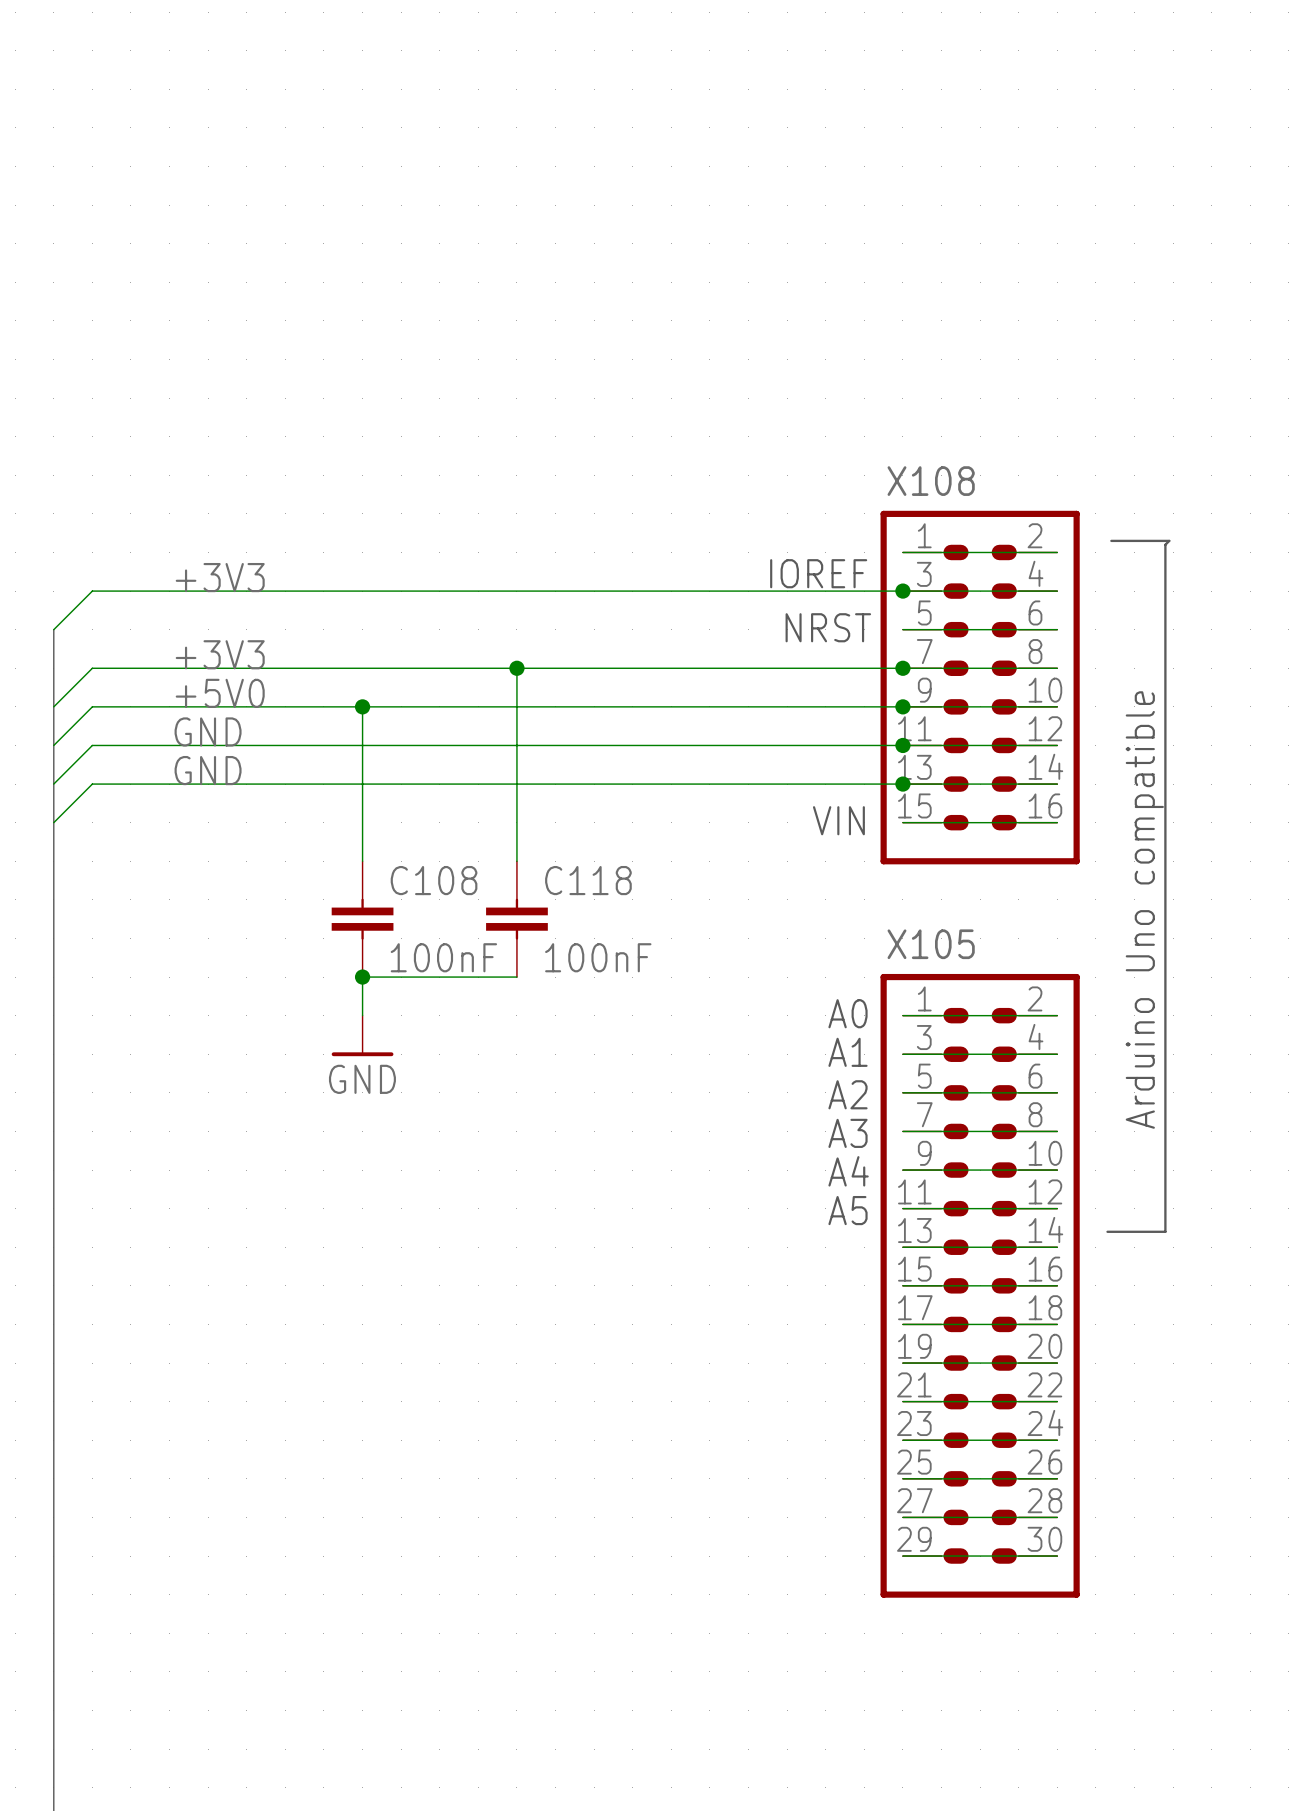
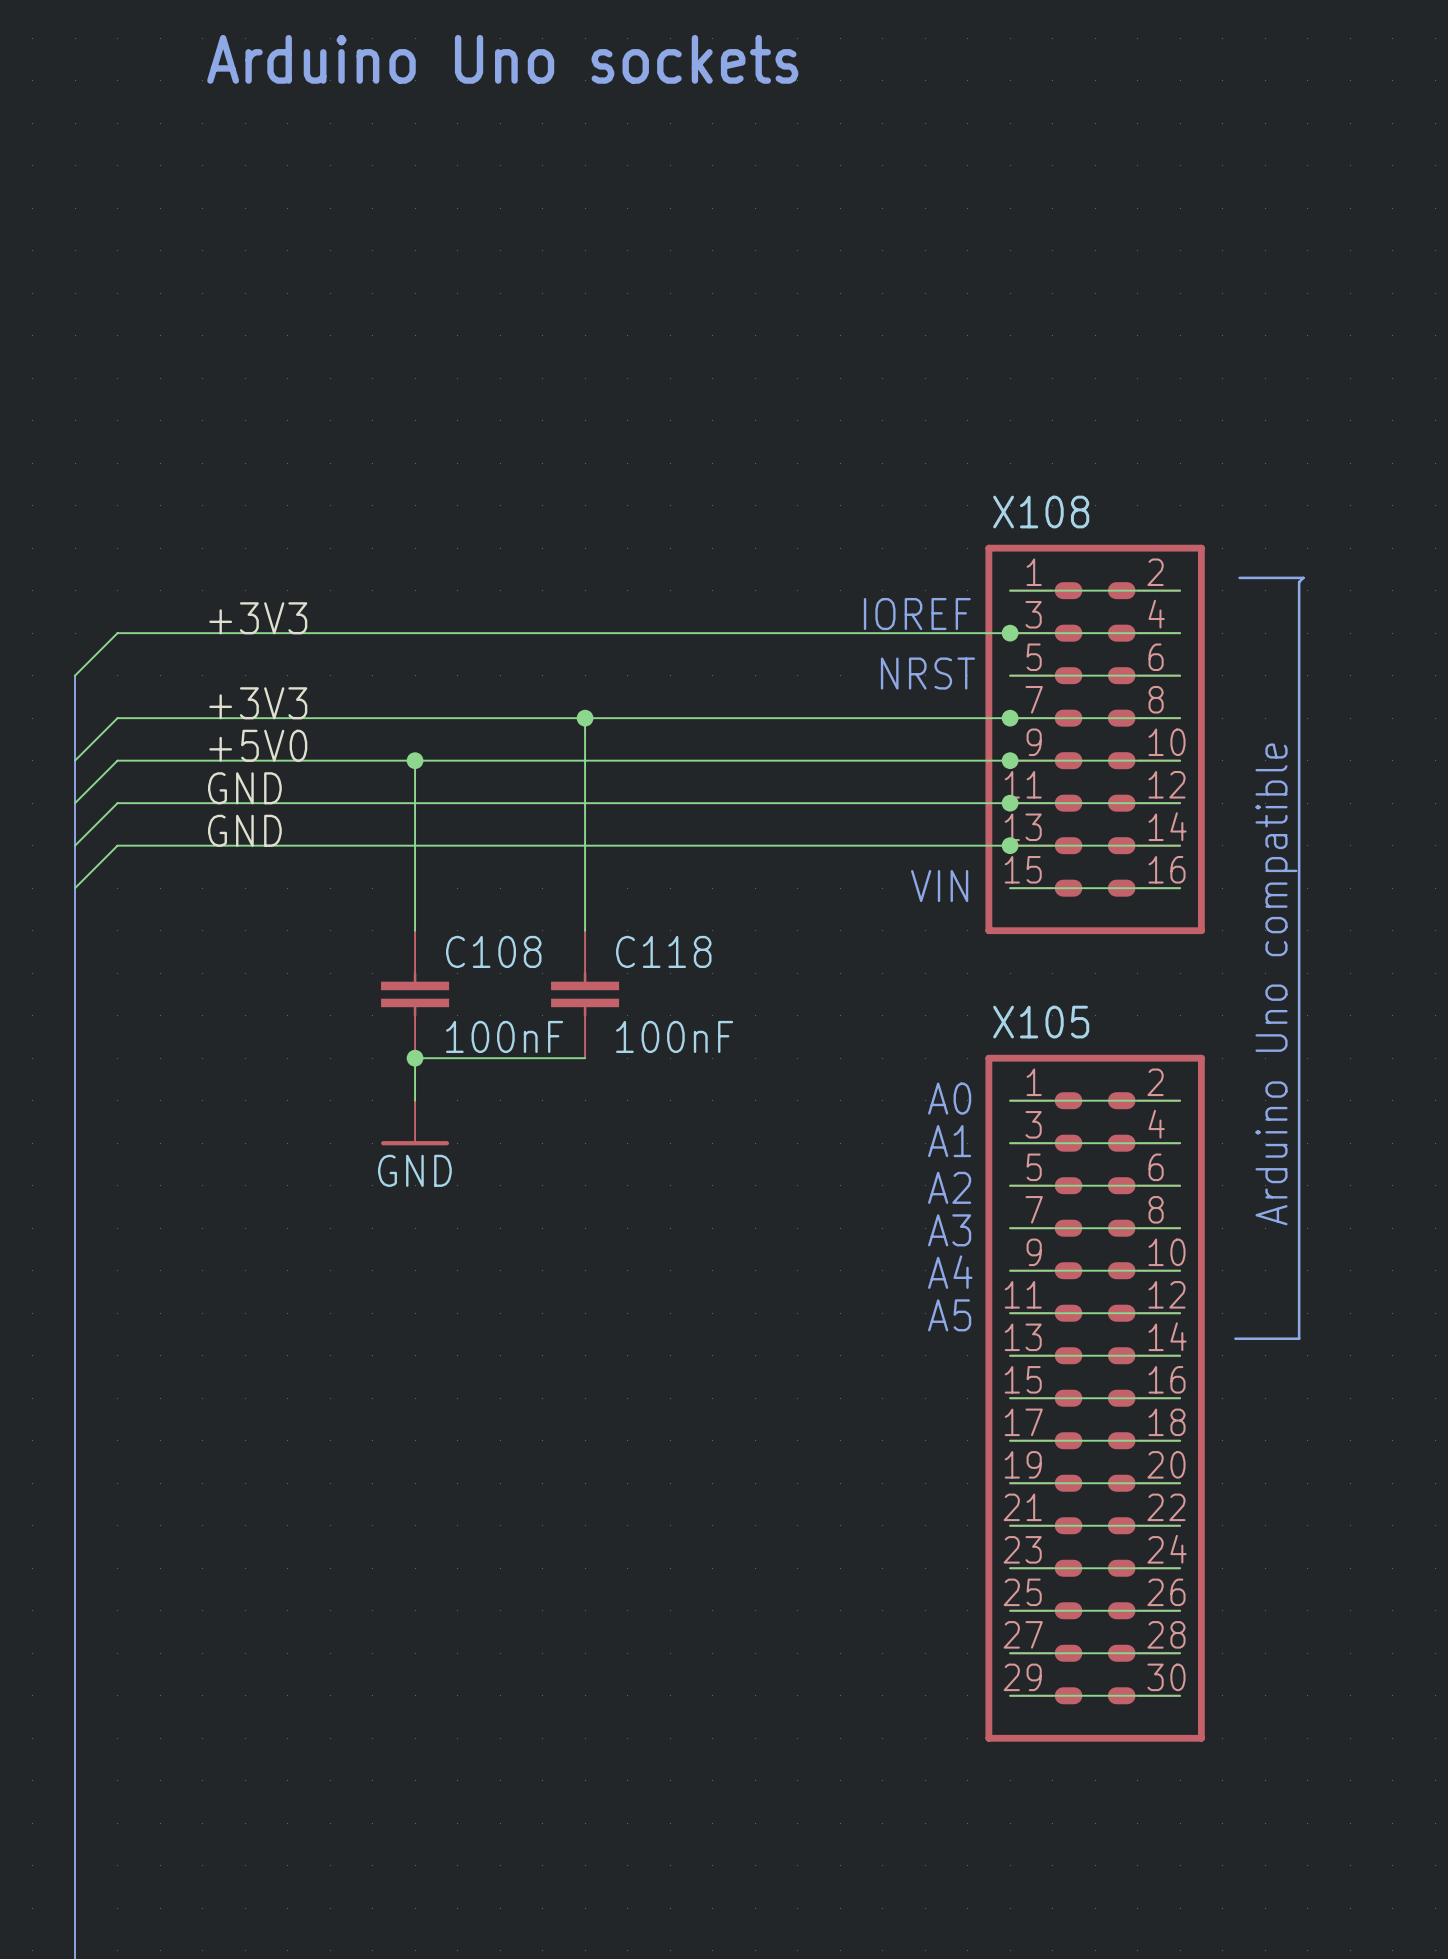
text: none -> Arduino Uno sockets (502, 59)

